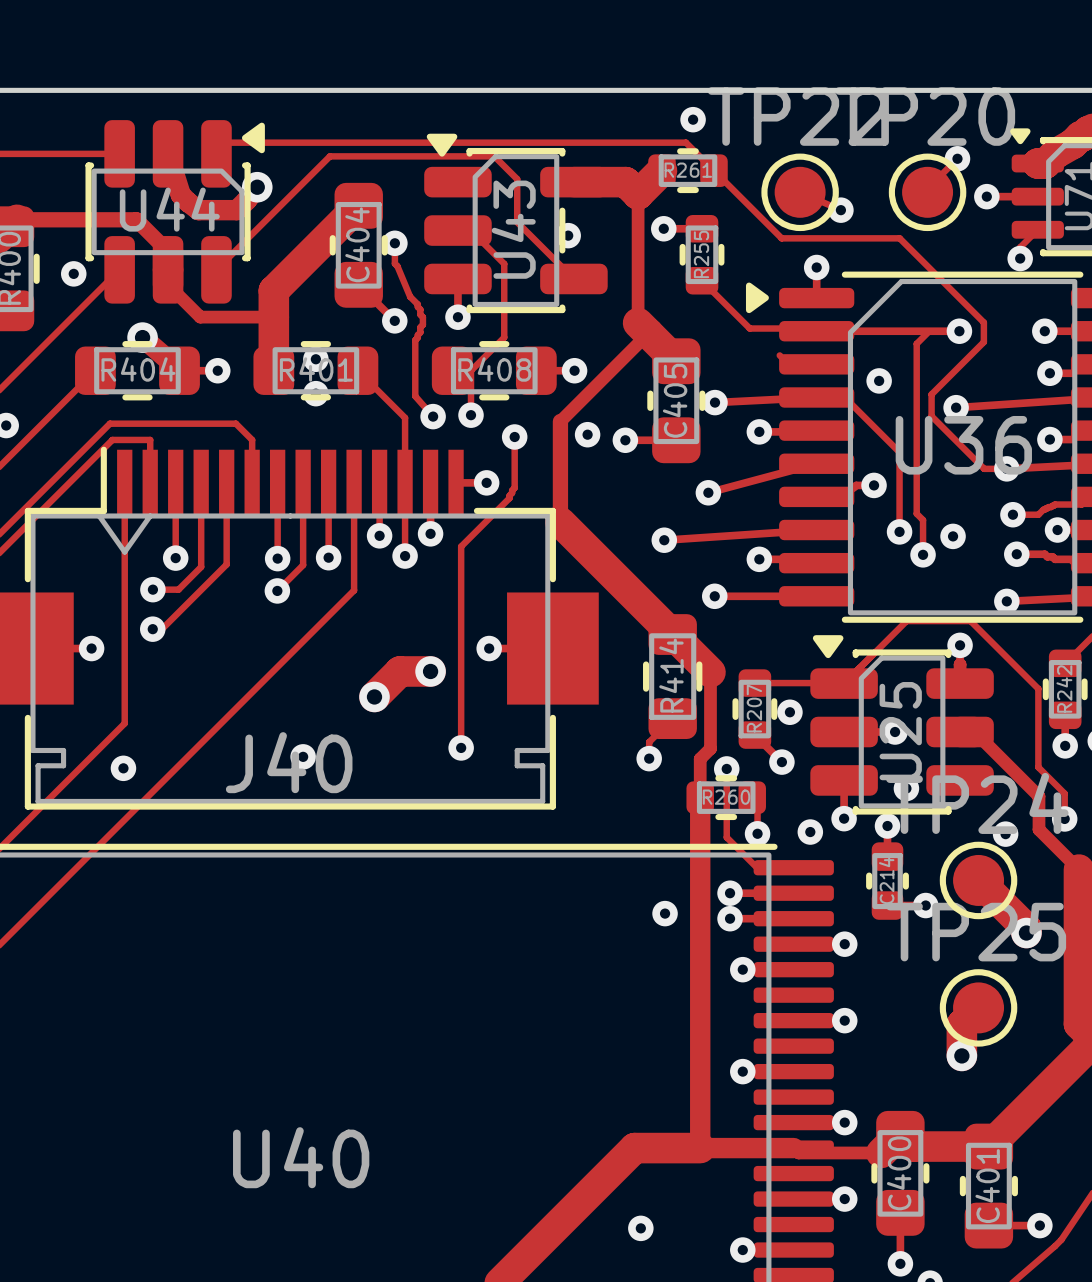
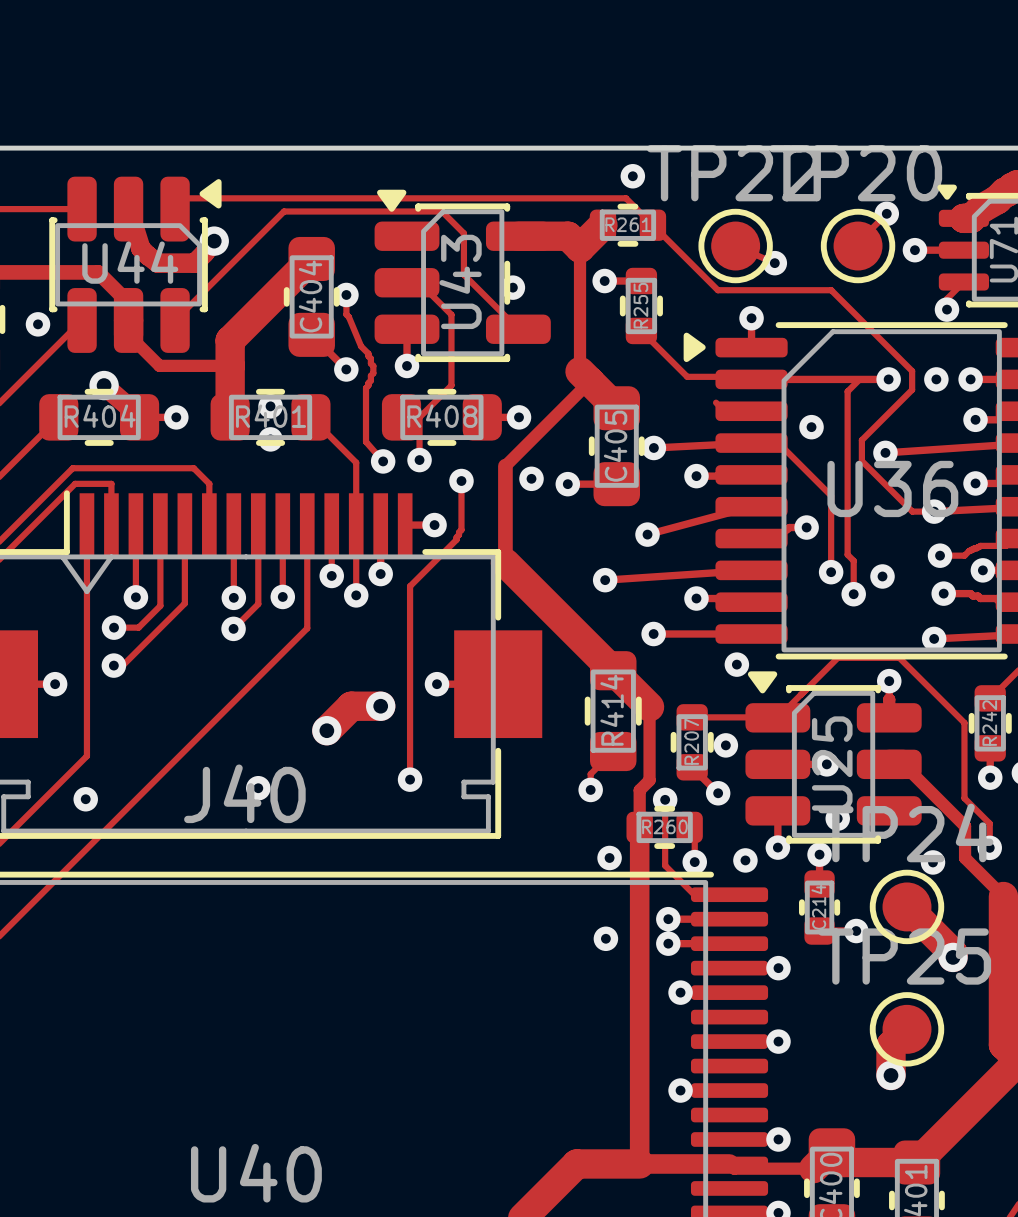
via: none -> (936, 379)
via: none -> (736, 664)
via: none -> (609, 857)

